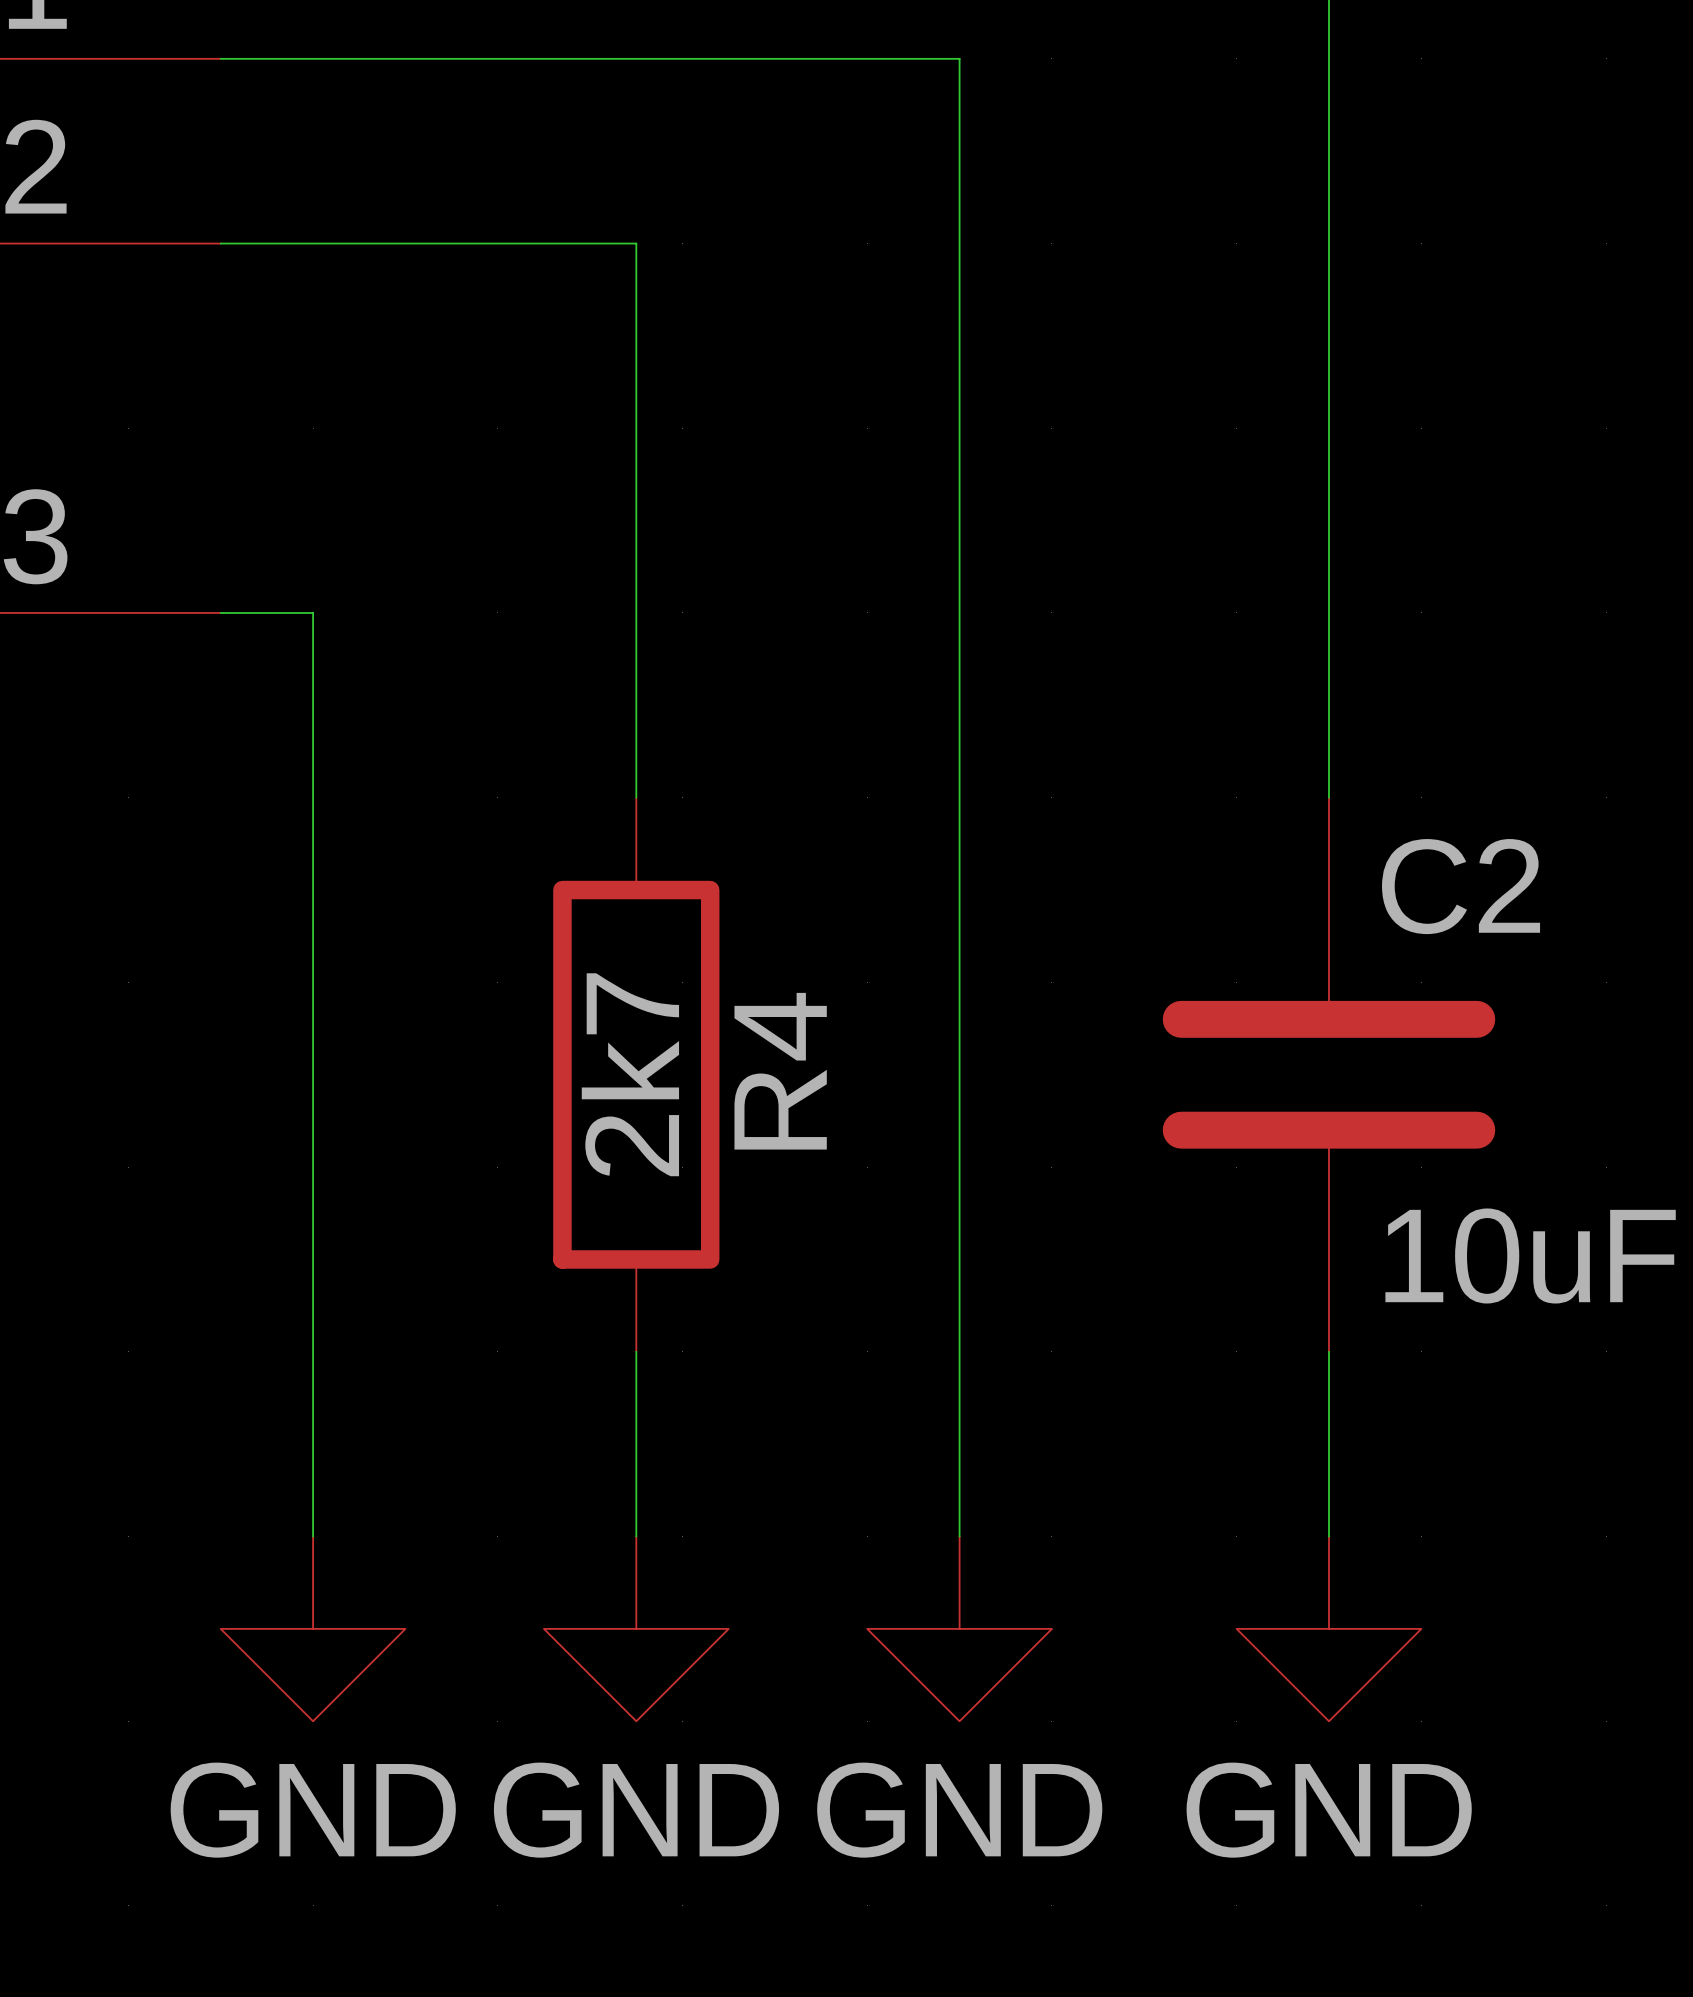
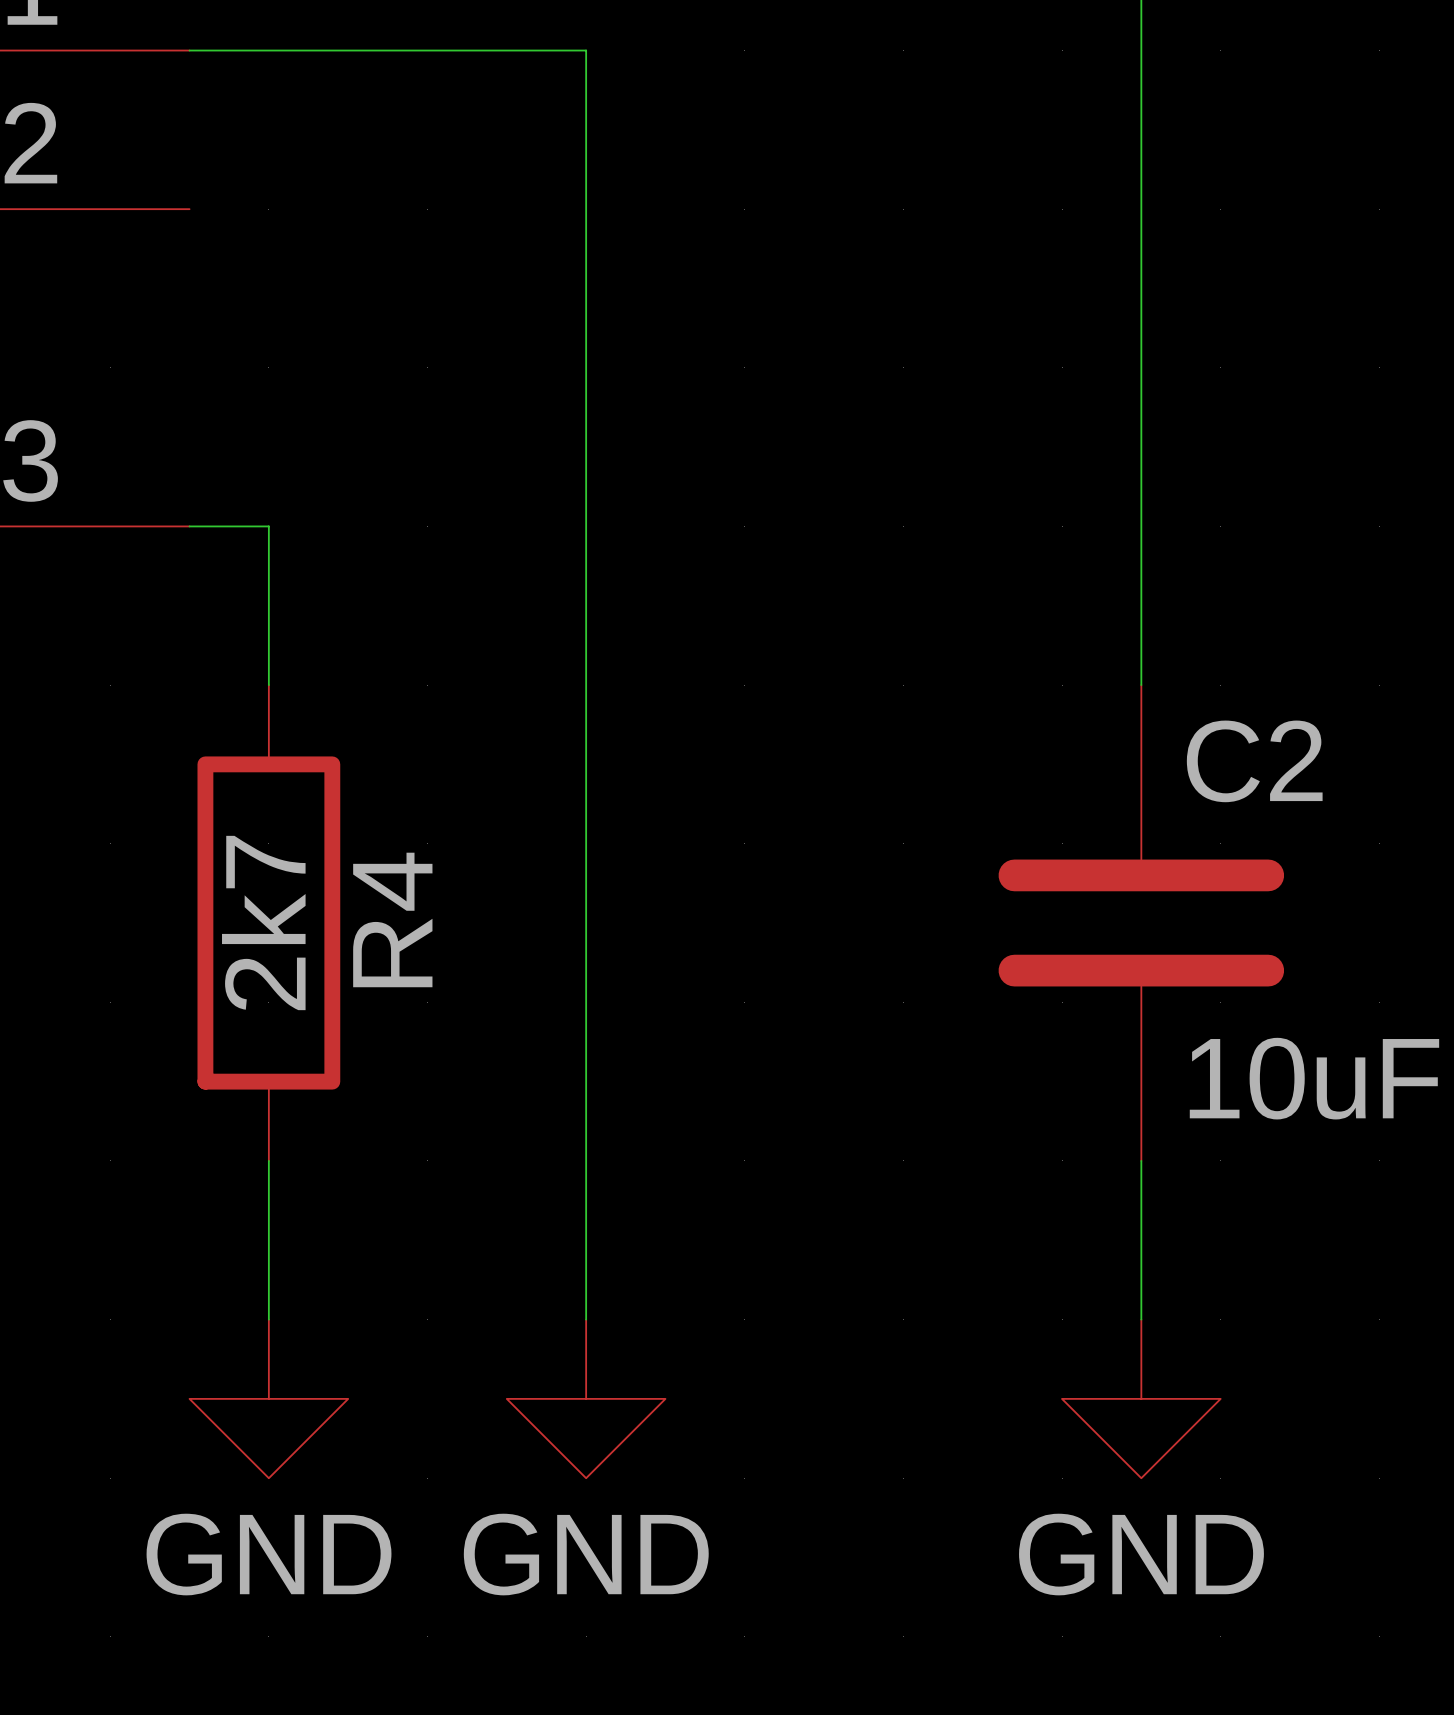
wire: (682, 58) (959, 58) (959, 1536) -> (586, 50) (586, 1319)
wire: (220, 243) (636, 243) (636, 797) -> none
wire: (313, 797) (313, 1351) -> none
R4 position: (636, 1074) -> (268, 923)
wire: (636, 1351) (636, 1536) -> none
power symbol position: GND (636, 1628) -> GND (586, 1398)
power symbol: GND (959, 1628) -> none

